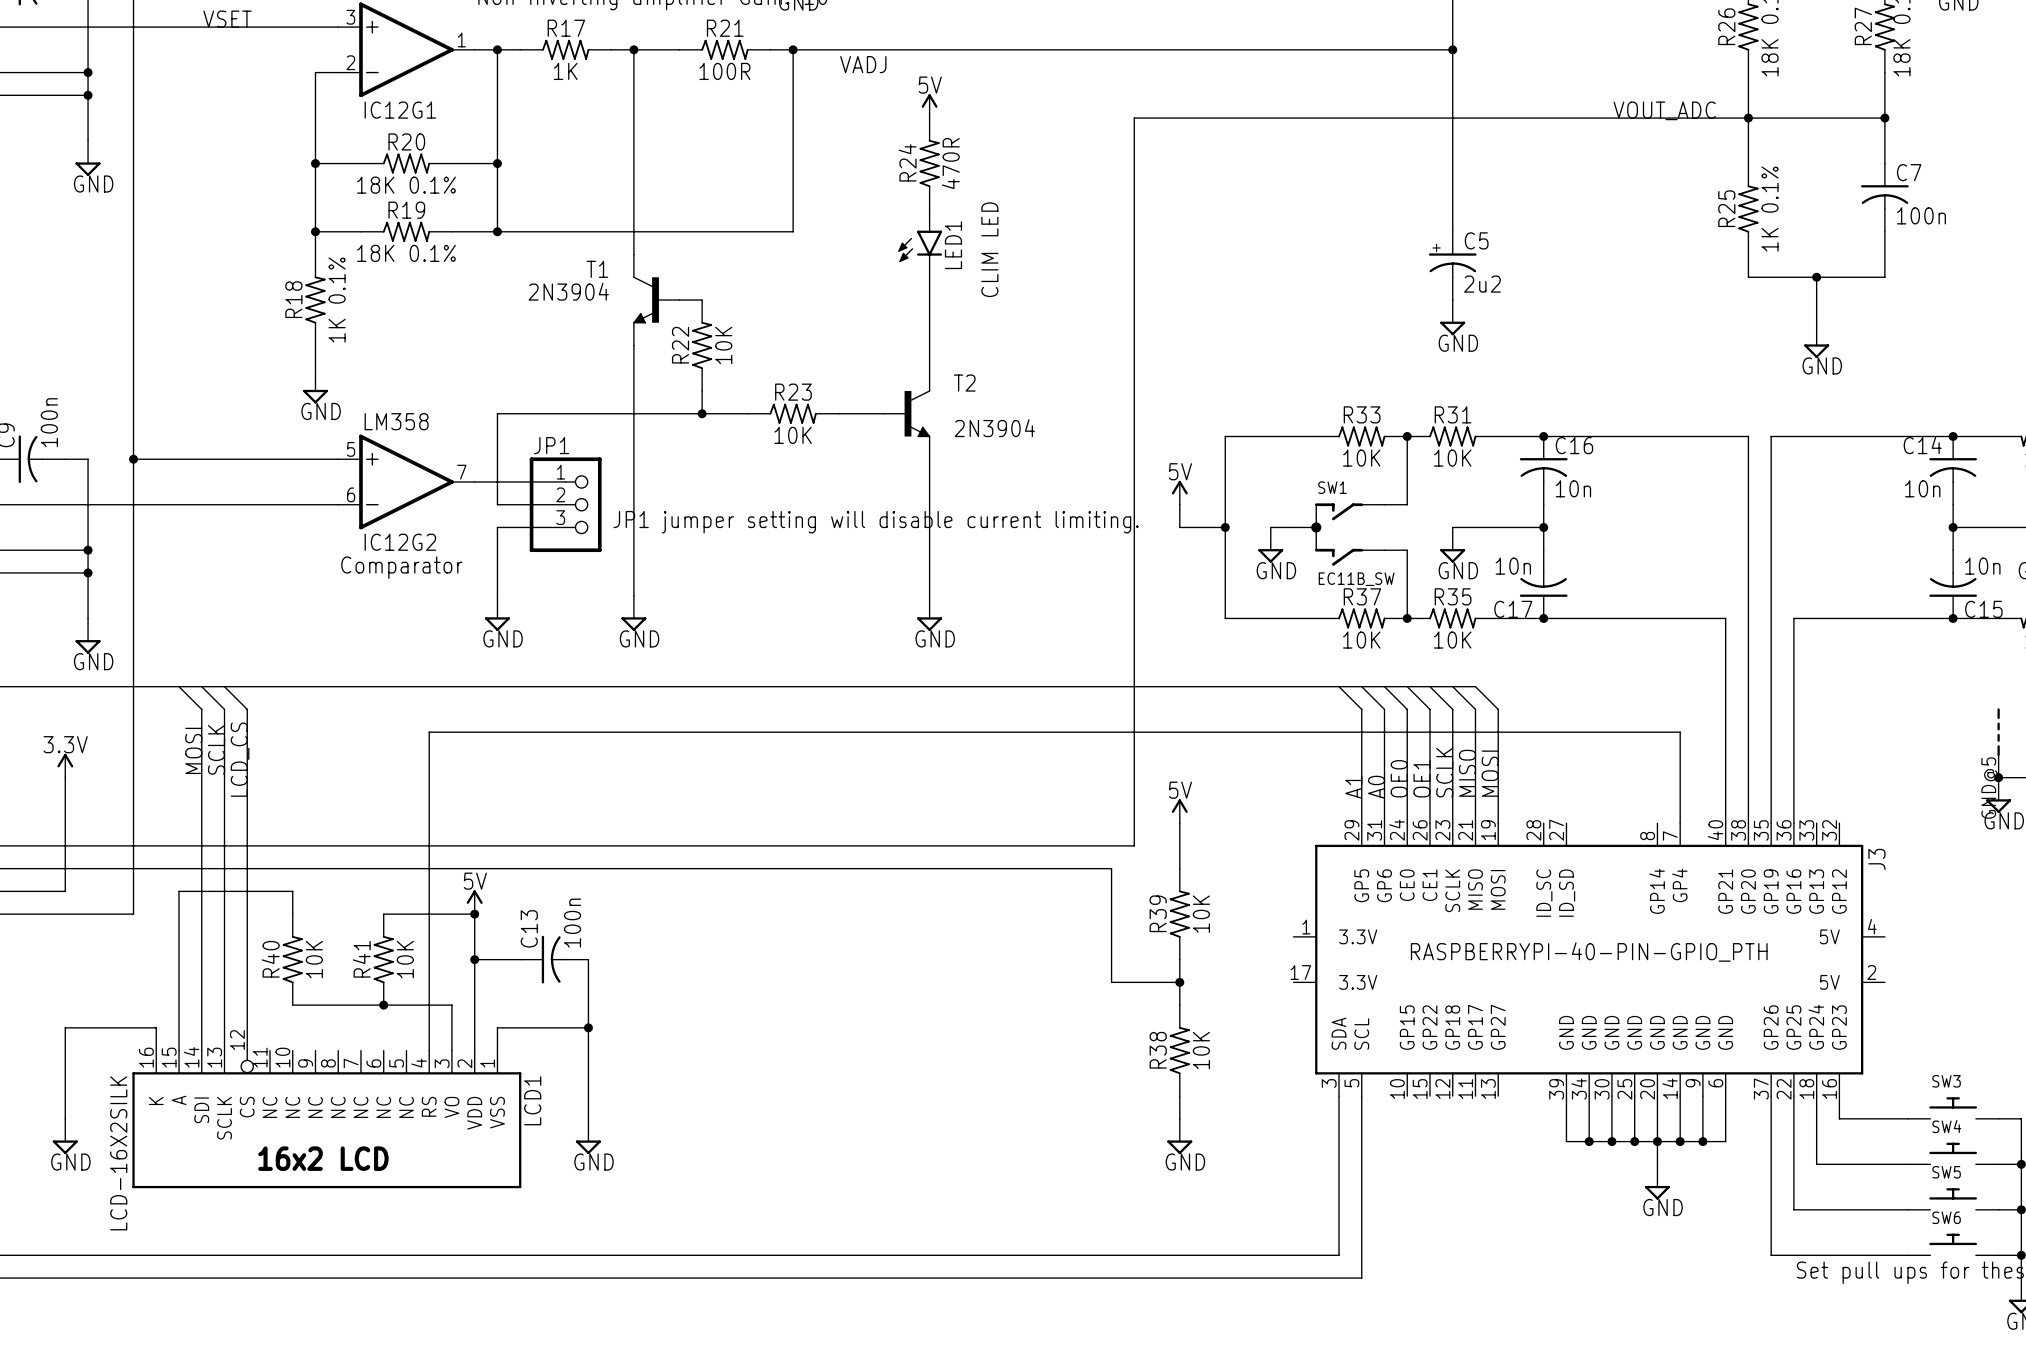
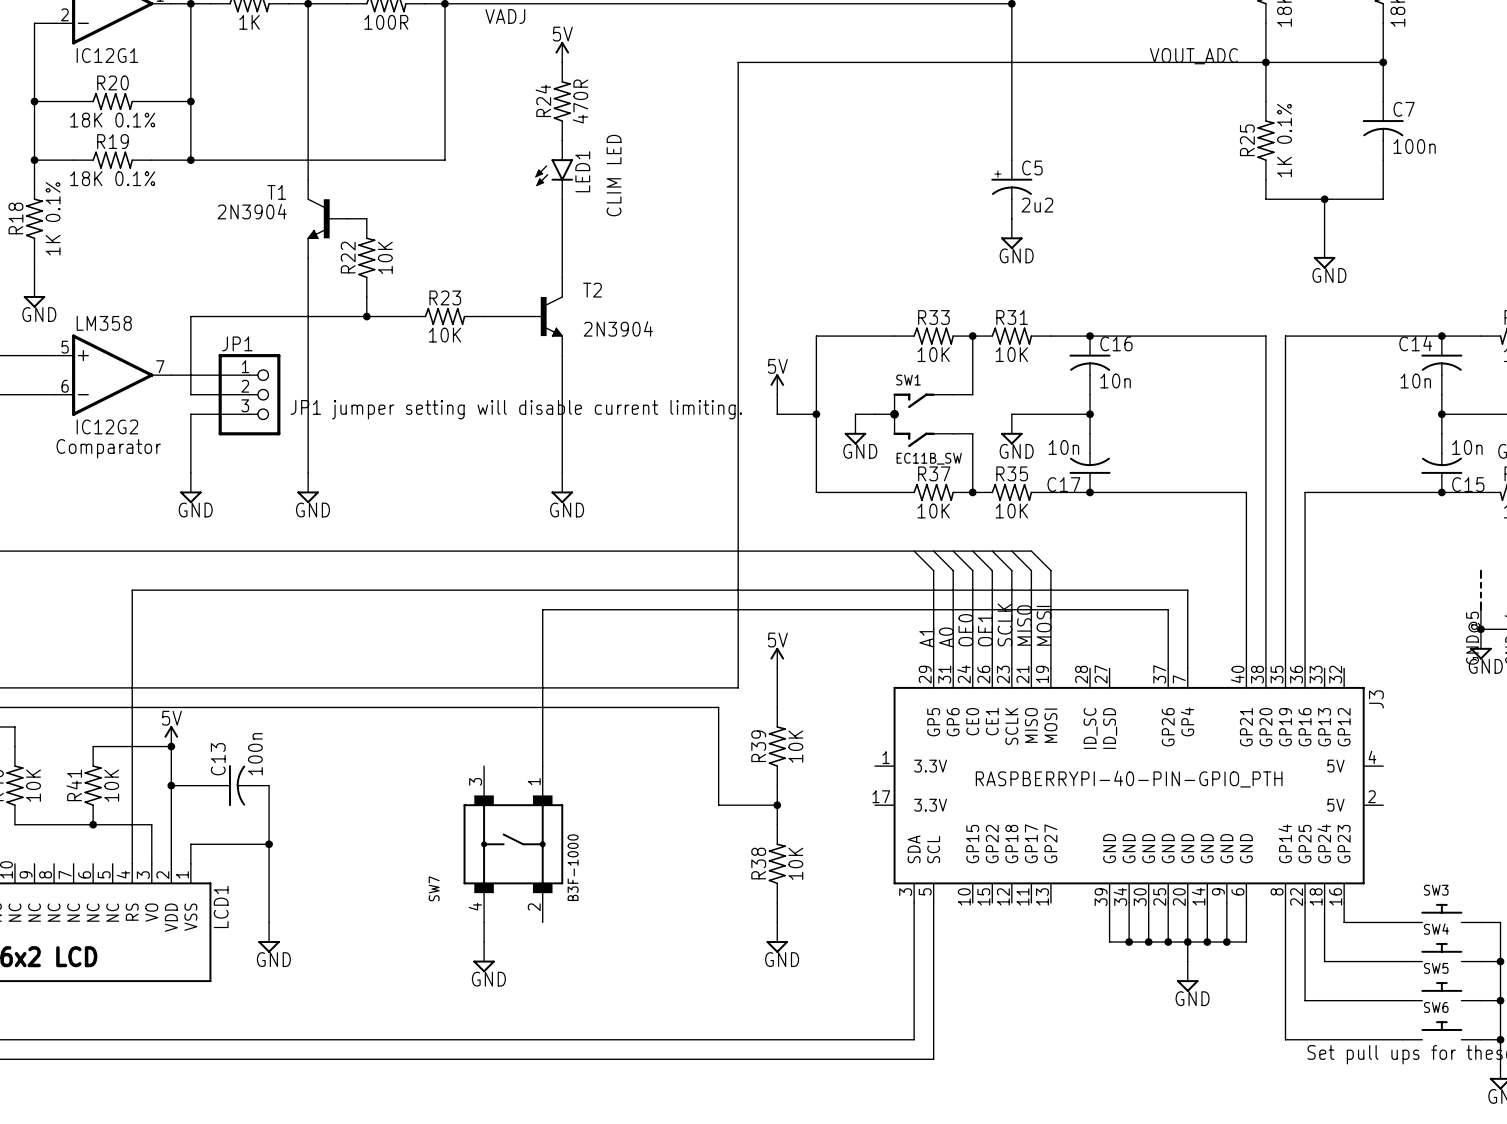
wire: (1657, 732) (1680, 732) (1680, 823) -> (1187, 590) (1187, 668)
J3 symbol: [1293, 823, 1885, 1097] -> [875, 668, 1384, 903]
wire: none -> (1168, 668) (1168, 609) (542, 609) (542, 766)
SW7: none -> B3F-1000 (513, 844)
wire: none -> (484, 922) (484, 942)
power symbol: none -> GND (484, 957)

